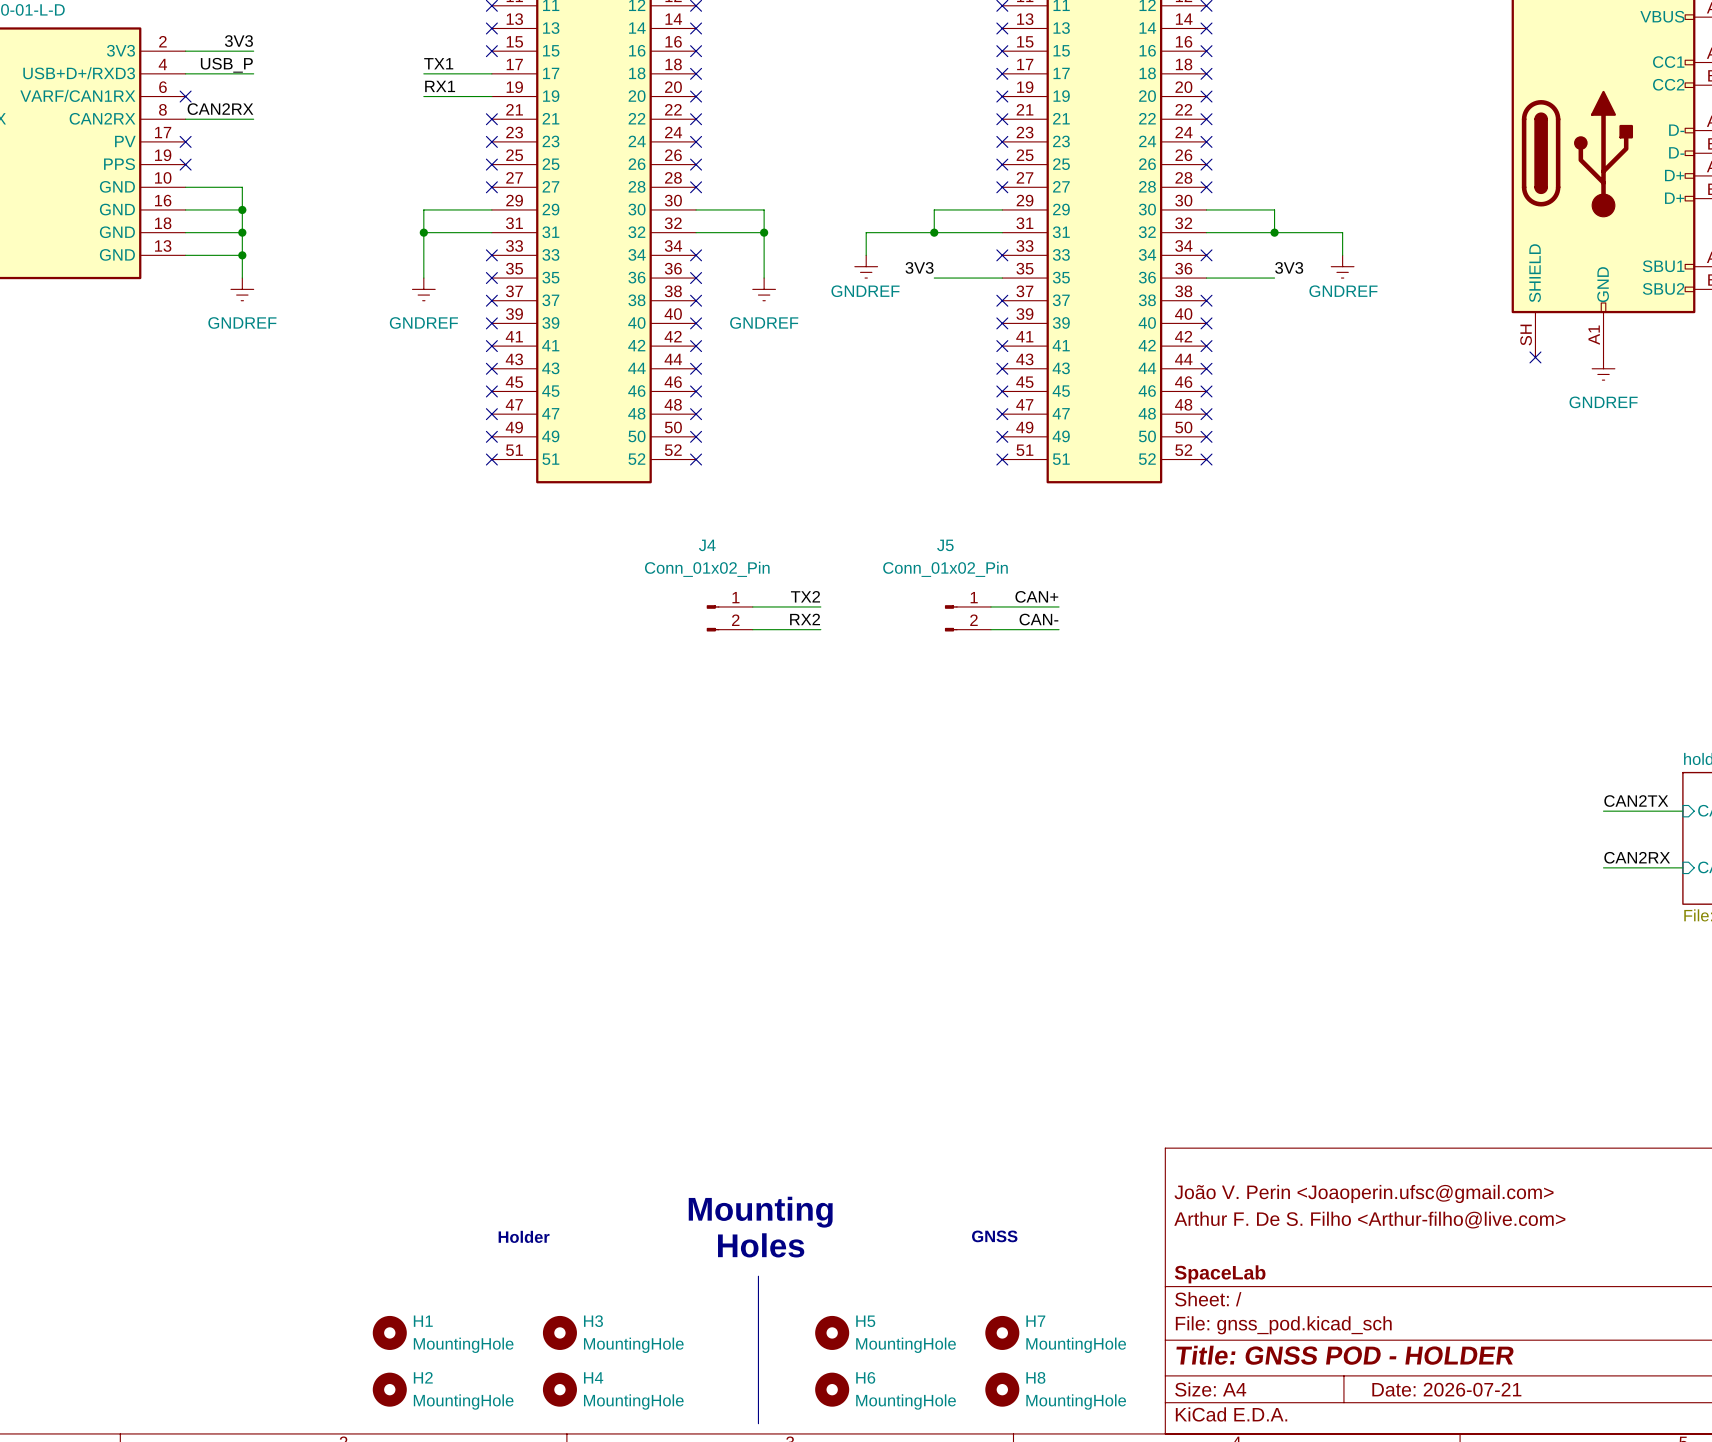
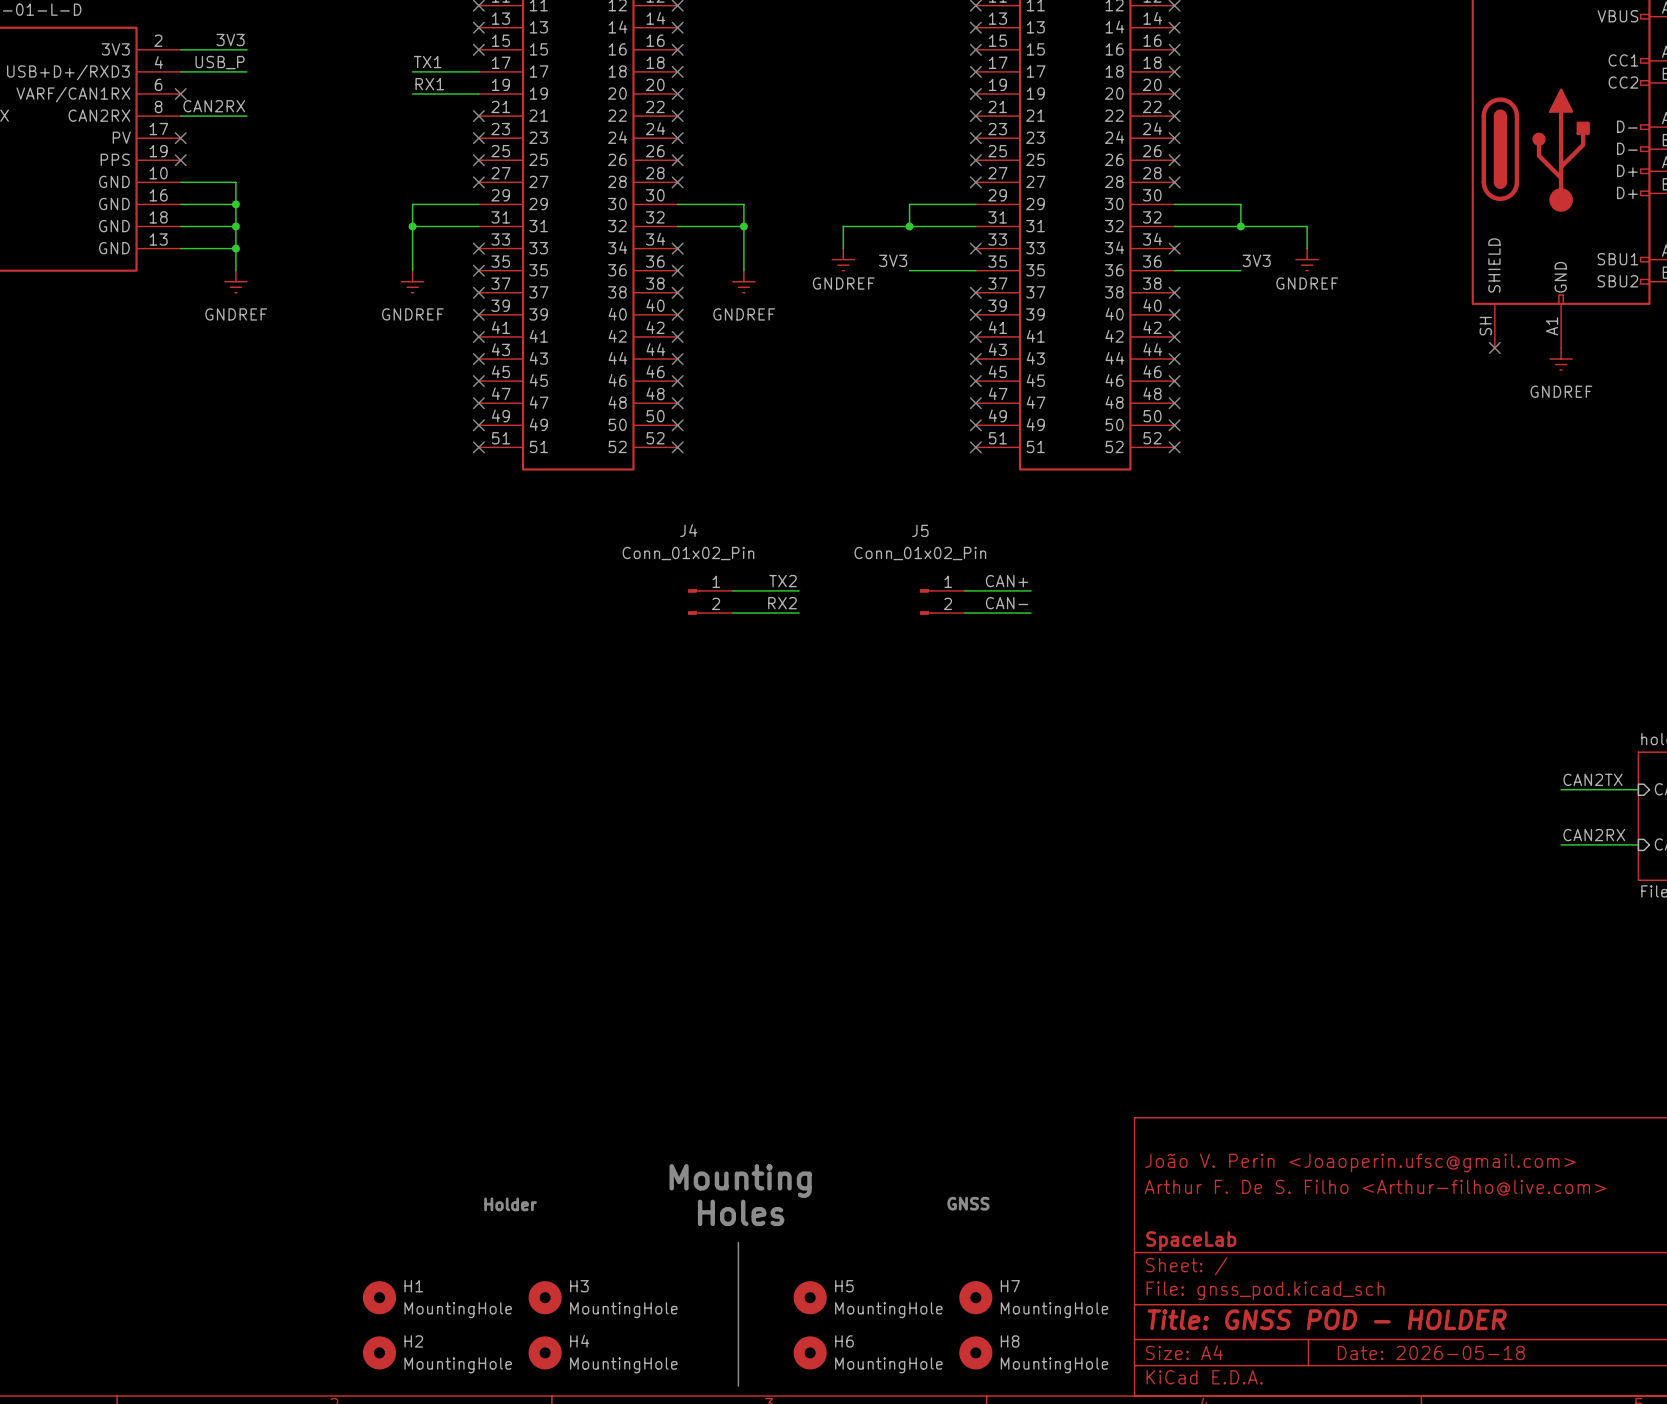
title block: Date: 2026-07-21 (1446, 1389) -> Date: 2026-05-18 (1431, 1352)

